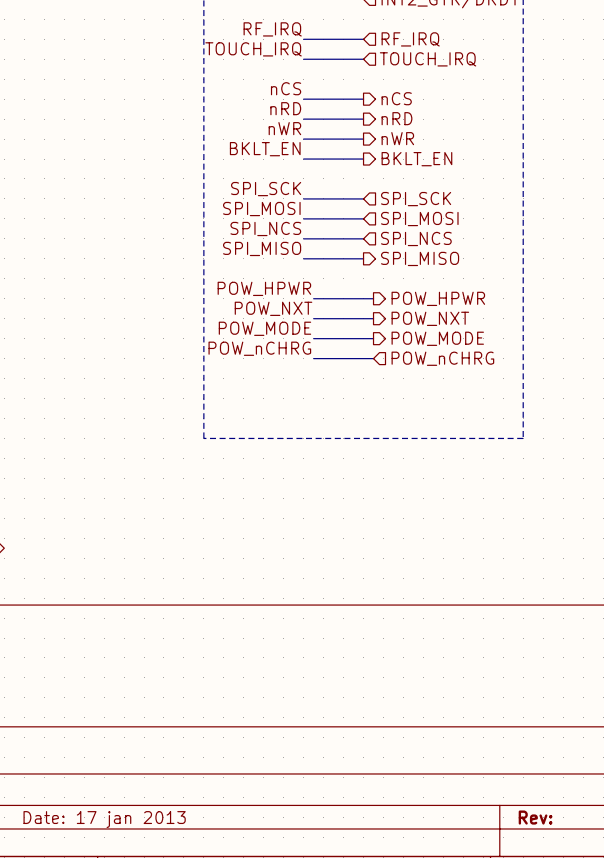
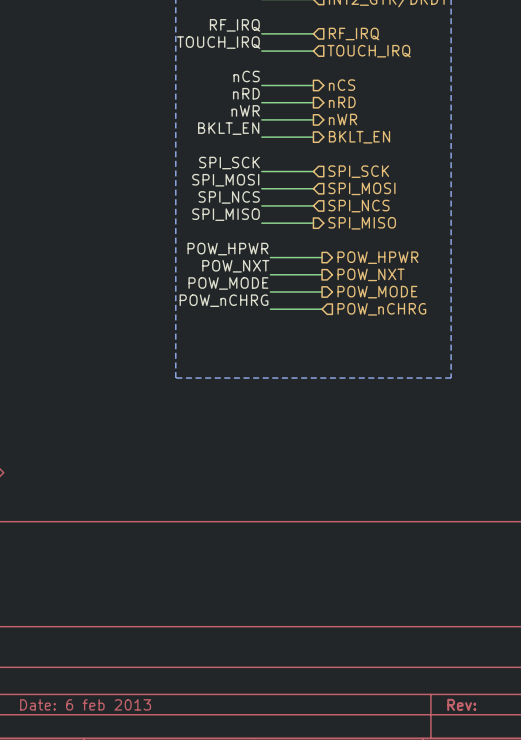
title block: Date: 17 jan 2013 (104, 819) -> Date: 6 feb 2013 (85, 704)

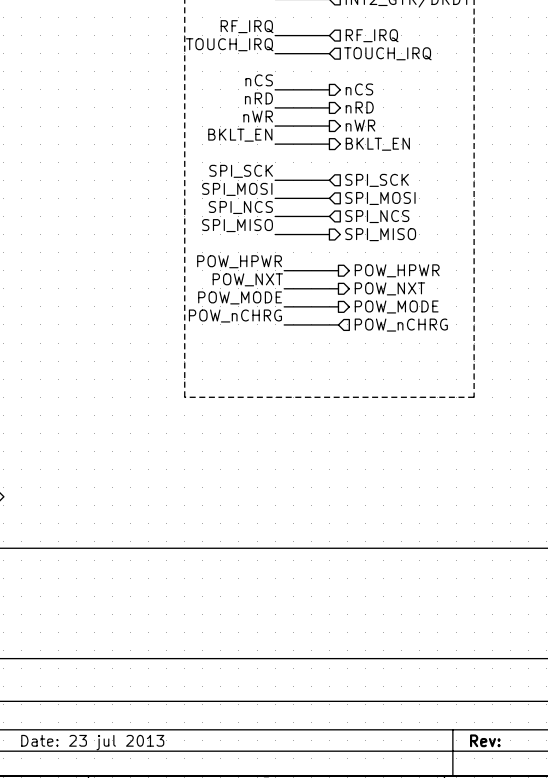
title block: Date: 6 feb 2013 (85, 704) -> Date: 23 jul 2013 (92, 742)

